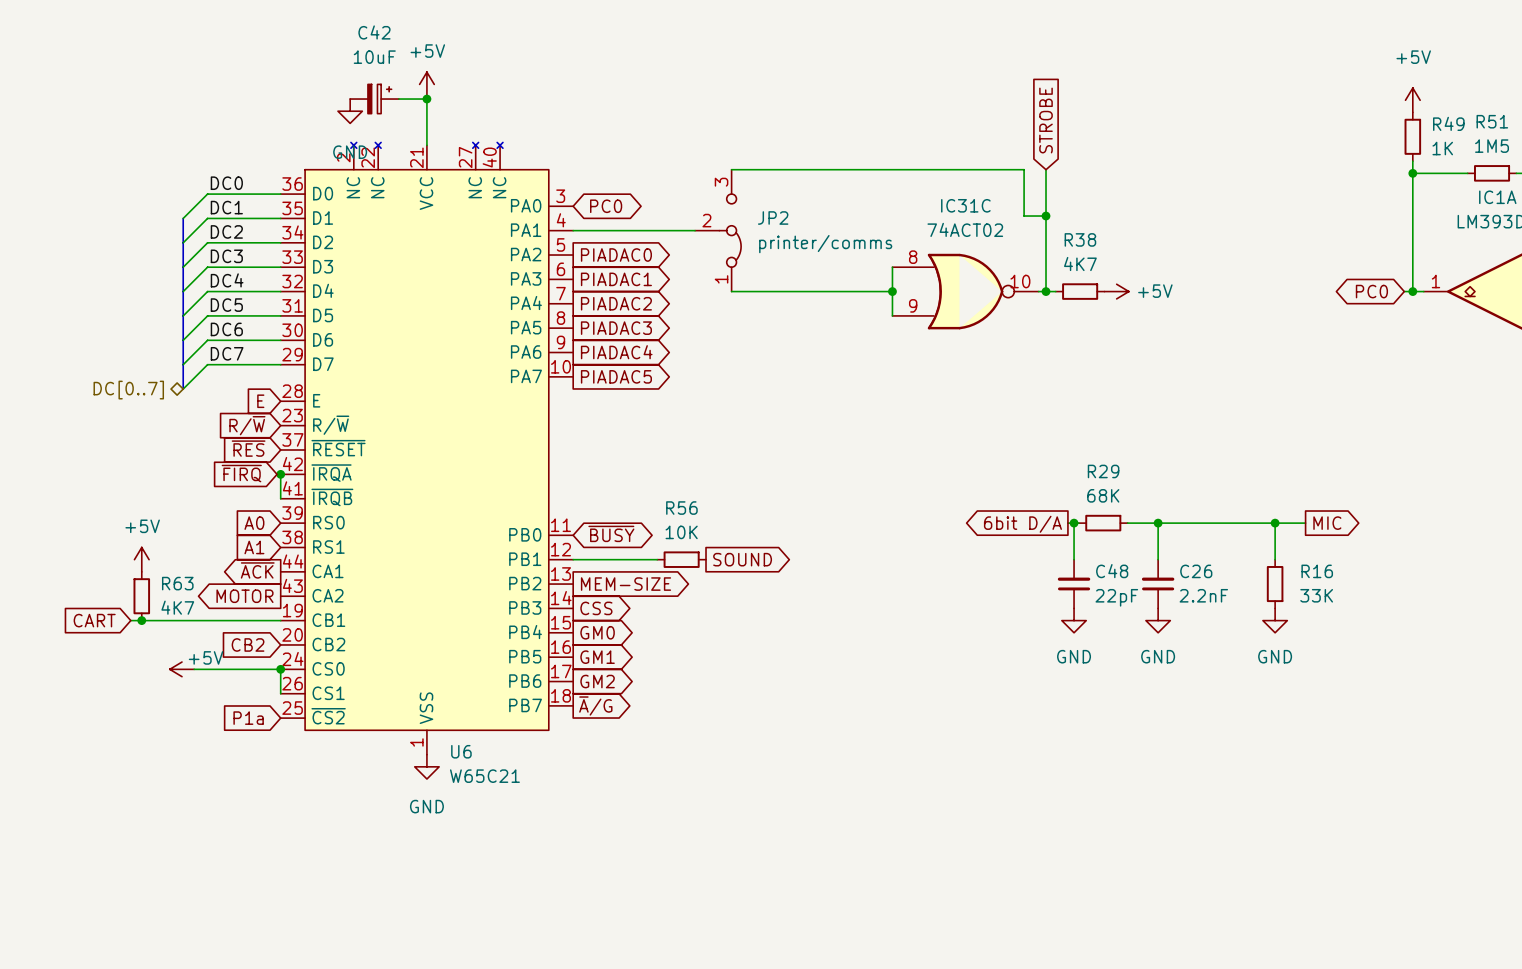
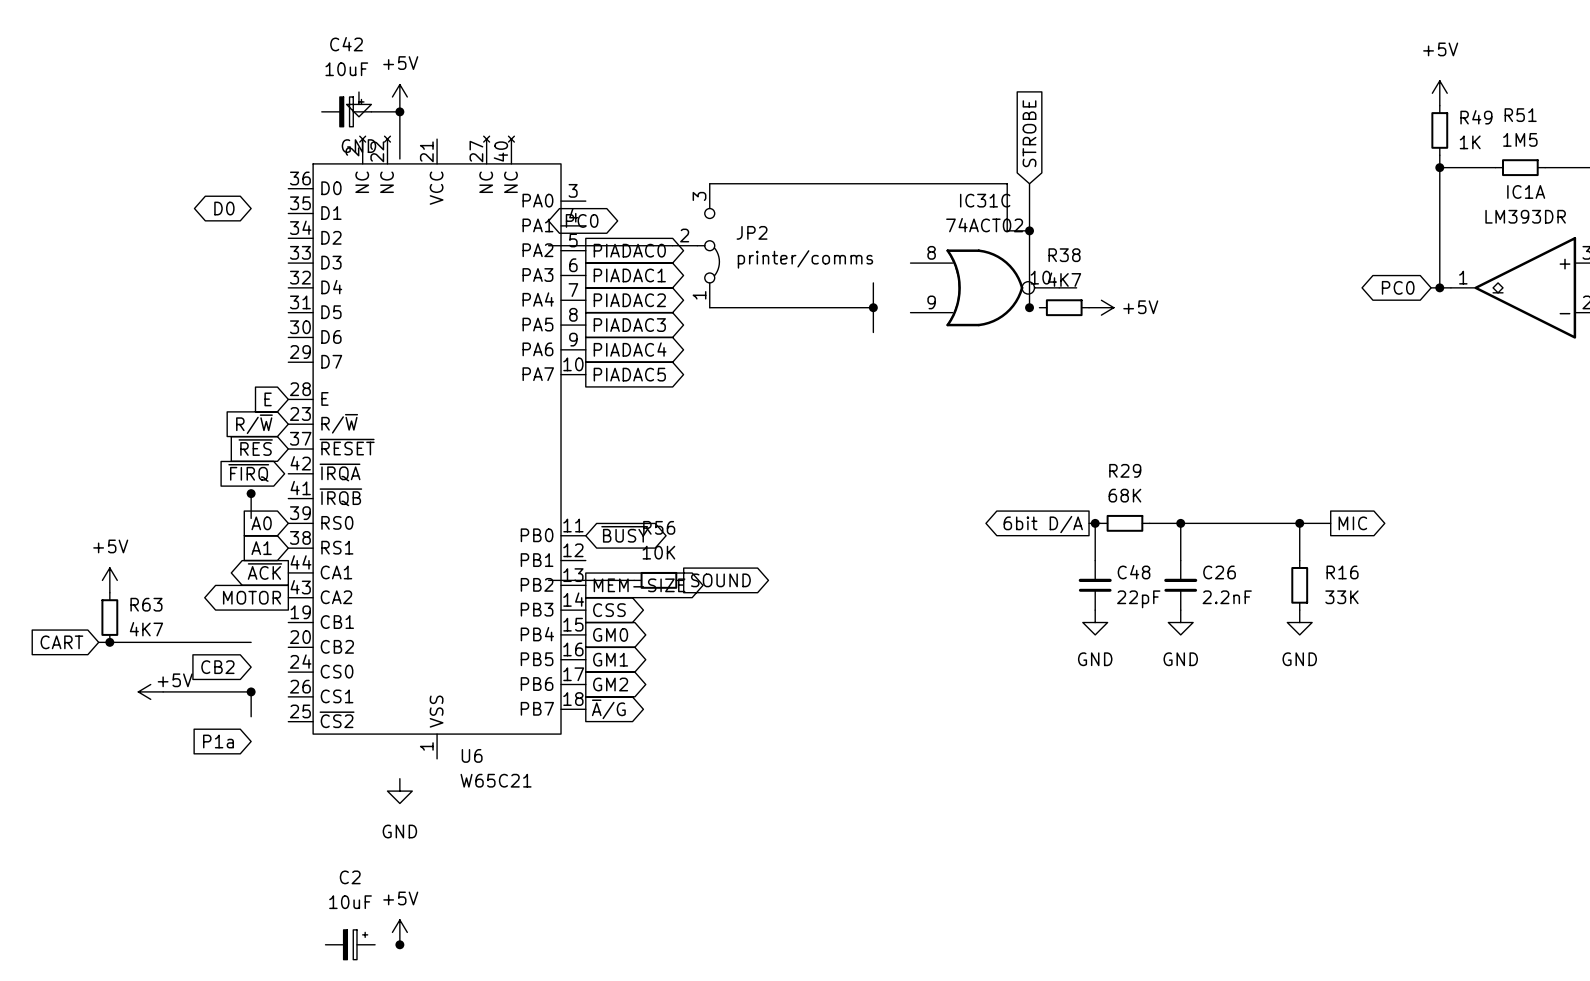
power symbol position: +5V (426, 84) -> +5V (399, 96)
wire: (426, 96) (426, 145) -> (399, 109) (399, 158)
C42 position: (374, 99) -> (346, 111)
wire: (398, 99) (426, 99) -> (371, 111) (399, 111)
junction position: (426, 99) -> (399, 111)
global label position: STROBE (1046, 120) -> STROBE (1029, 133)
wire: (731, 169) (1024, 169) (1024, 216) (1046, 216) -> (709, 183) (1007, 183) (1007, 230) (1029, 230)
wire: (1046, 169) (1046, 291) -> (1029, 183) (1029, 307)
label: DC0 (226, 183) -> none
wire: (280, 194) (207, 194) (183, 218) -> none
global label position: PC0 (606, 206) -> PC0 (582, 220)
label: DC1 (226, 207) -> none
global label: none -> D0 (224, 208)
junction: (1046, 216) -> none
bus: (183, 218) (183, 389) -> none
wire: (280, 218) (207, 218) (183, 242) -> none
wire: (573, 230) (695, 230) -> (548, 245) (672, 245)
JP2 position: (718, 230) -> (695, 245)
label: DC2 (226, 231) -> none
junction: none -> (1029, 230)
wire: (280, 242) (207, 242) (183, 267) -> none
label: DC3 (226, 256) -> none
wire: (280, 267) (207, 267) (183, 291) -> none
wire: (892, 267) (892, 315) -> (873, 282) (873, 332)
label: DC4 (227, 280) -> none
wire: (280, 291) (207, 291) (183, 315) -> none
wire: (731, 291) (892, 291) -> (709, 307) (873, 307)
junction position: (892, 291) -> (873, 307)
junction: (1046, 291) -> none
R38 position: (1080, 291) -> (1064, 307)
power symbol position: +5V (1116, 291) -> +5V (1101, 307)
label: DC5 (226, 305) -> none
junction: none -> (1029, 307)
wire: (280, 315) (207, 315) (183, 340) -> none
label: DC6 (226, 329) -> none
wire: (280, 340) (207, 340) (183, 364) -> none
label: DC7 (227, 353) -> none
wire: (280, 364) (207, 364) (183, 389) -> none
hierarchical label: DC[0..7] (128, 390) -> none
wire: (277, 474) (280, 474) (280, 498) -> (247, 493) (251, 493) (251, 518)
junction position: (280, 474) -> (251, 493)
power symbol position: +5V (141, 559) -> +5V (109, 580)
wire: (573, 559) (657, 559) -> (548, 580) (634, 580)
R56 position: (681, 559) -> (658, 580)
global label position: SOUND (742, 559) -> SOUND (720, 580)
R63 position: (141, 596) -> (109, 617)
global label position: CART (94, 620) -> CART (61, 642)
wire: (130, 620) (280, 620) -> (98, 642) (251, 642)
junction position: (141, 620) -> (109, 642)
global label position: CB2 (248, 644) -> CB2 (217, 667)
power symbol position: +5V (181, 669) -> +5V (150, 691)
wire: (194, 669) (280, 669) (280, 693) -> (163, 691) (251, 691) (251, 716)
junction position: (280, 669) -> (251, 691)
global label position: P1a (248, 718) -> P1a (218, 741)
power symbol position: GND (426, 766) -> GND (399, 791)
power symbol: none -> +5V (399, 932)
C2: none -> 10uF (350, 944)
junction: none -> (399, 944)

